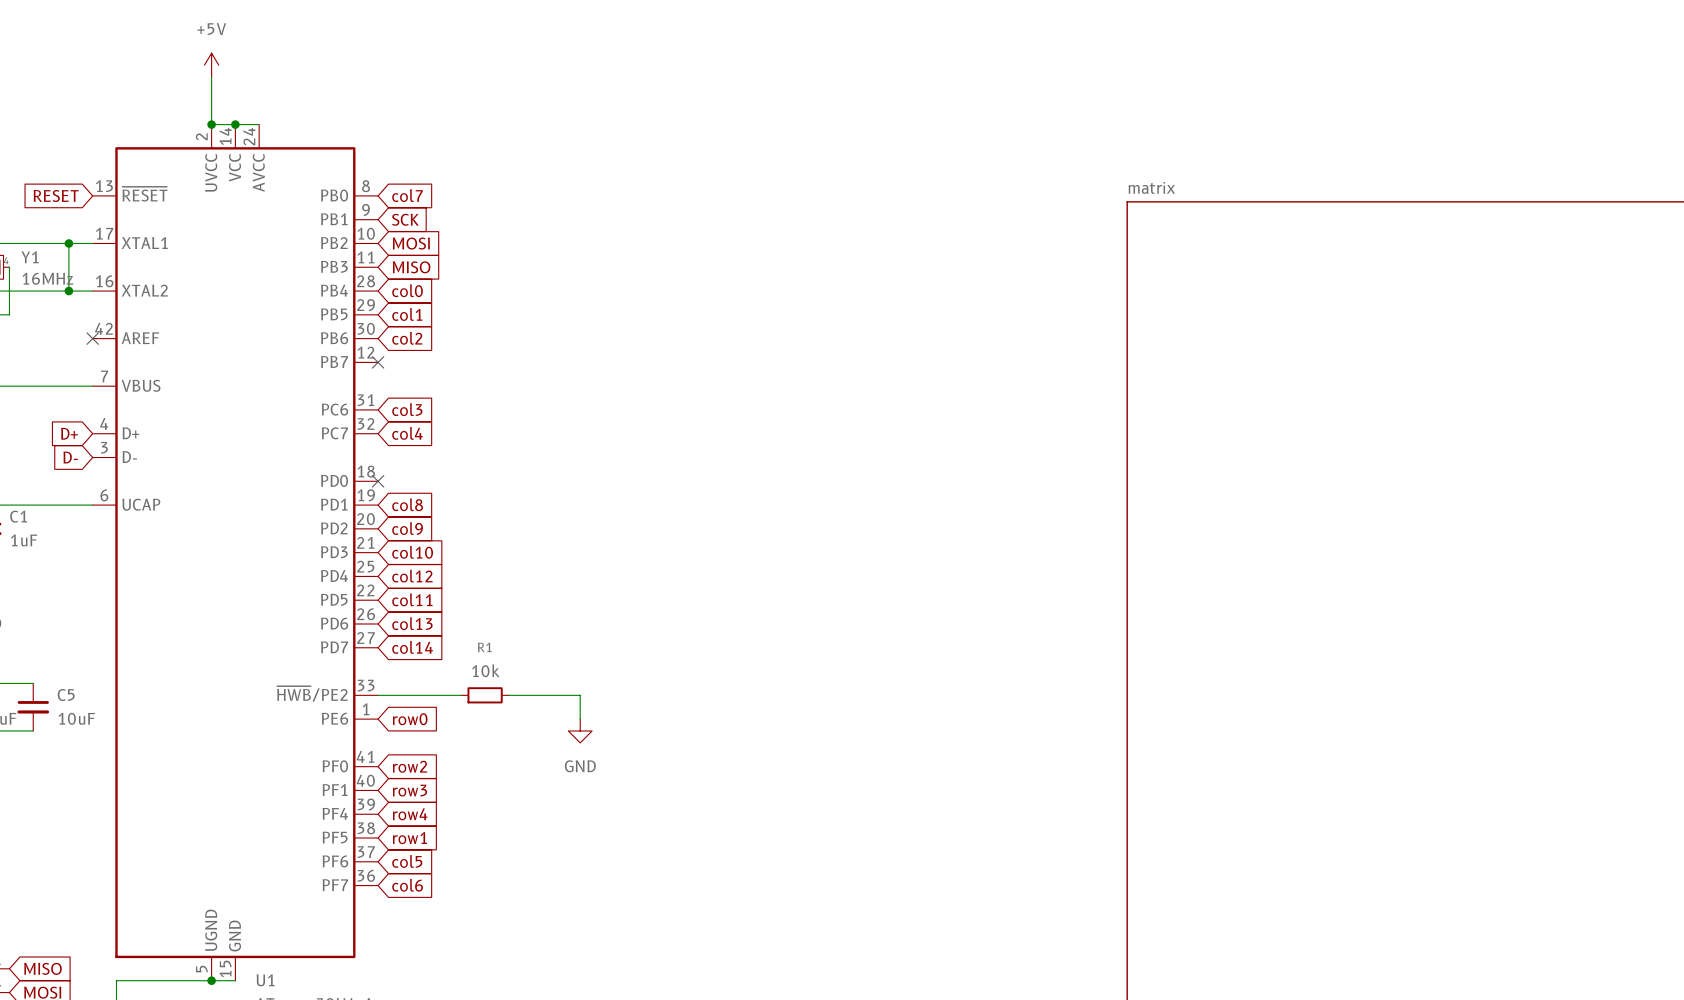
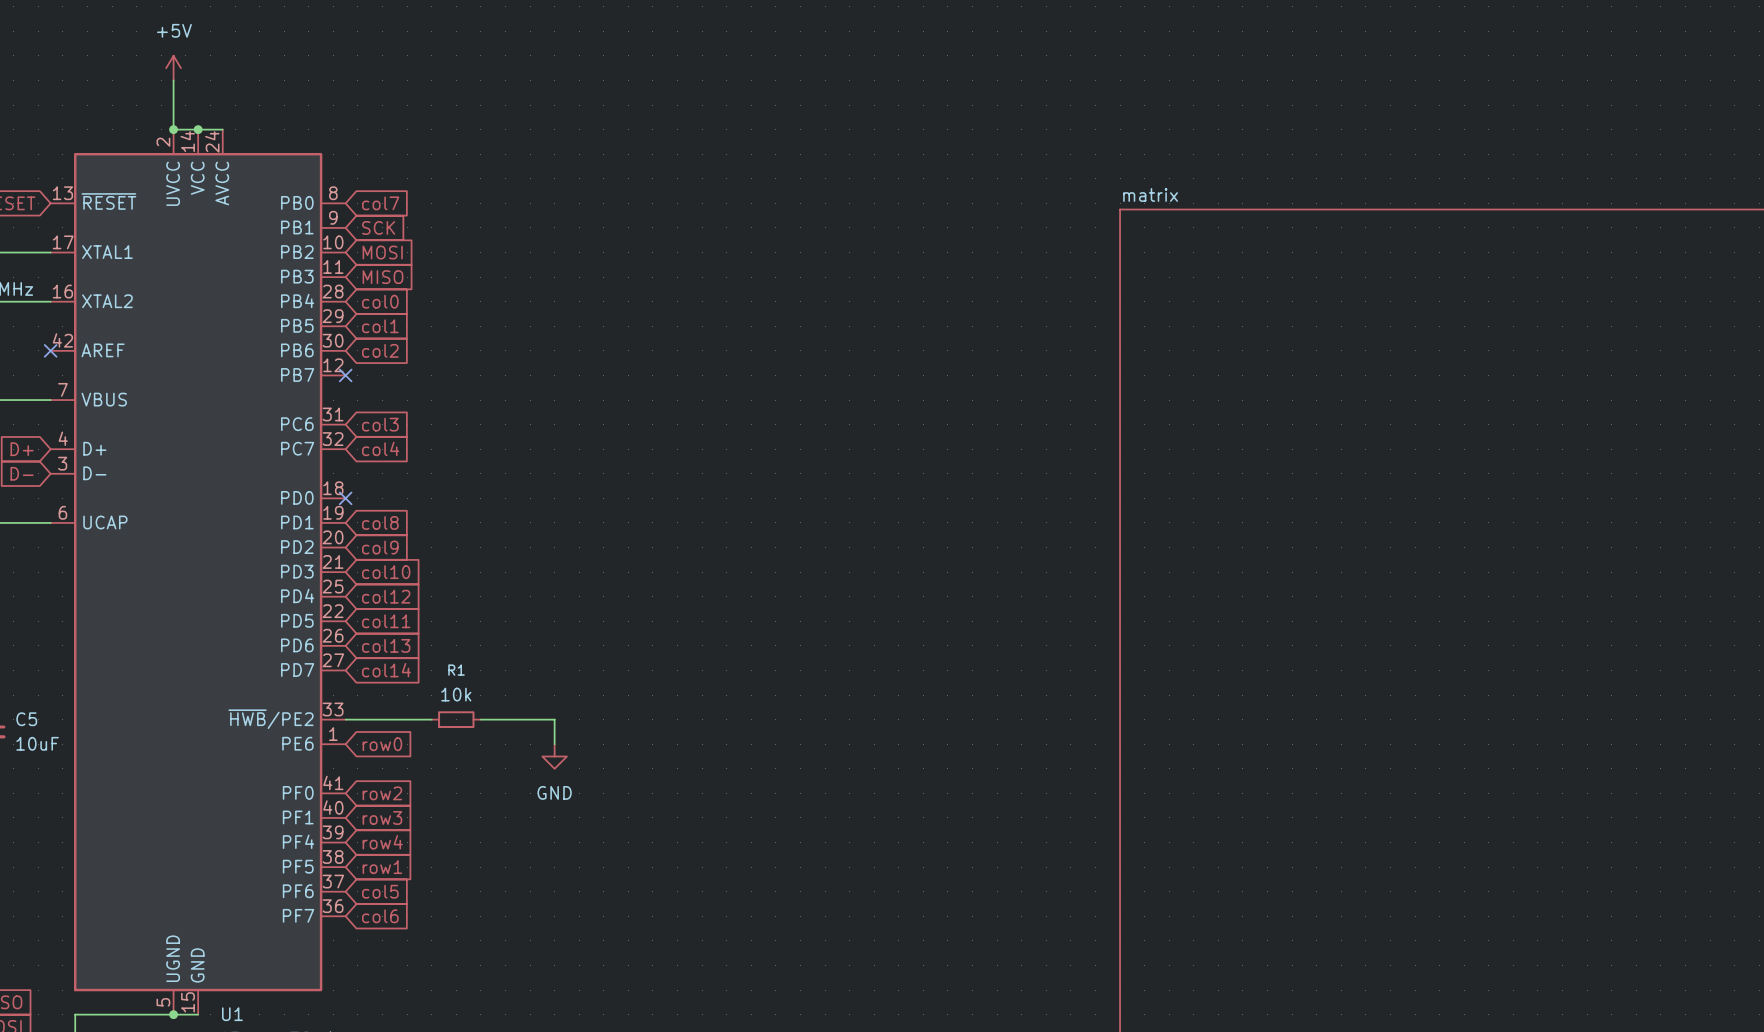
wire: (68, 243) (68, 291) -> none
junction: (68, 243) -> none
junction: (68, 291) -> none

